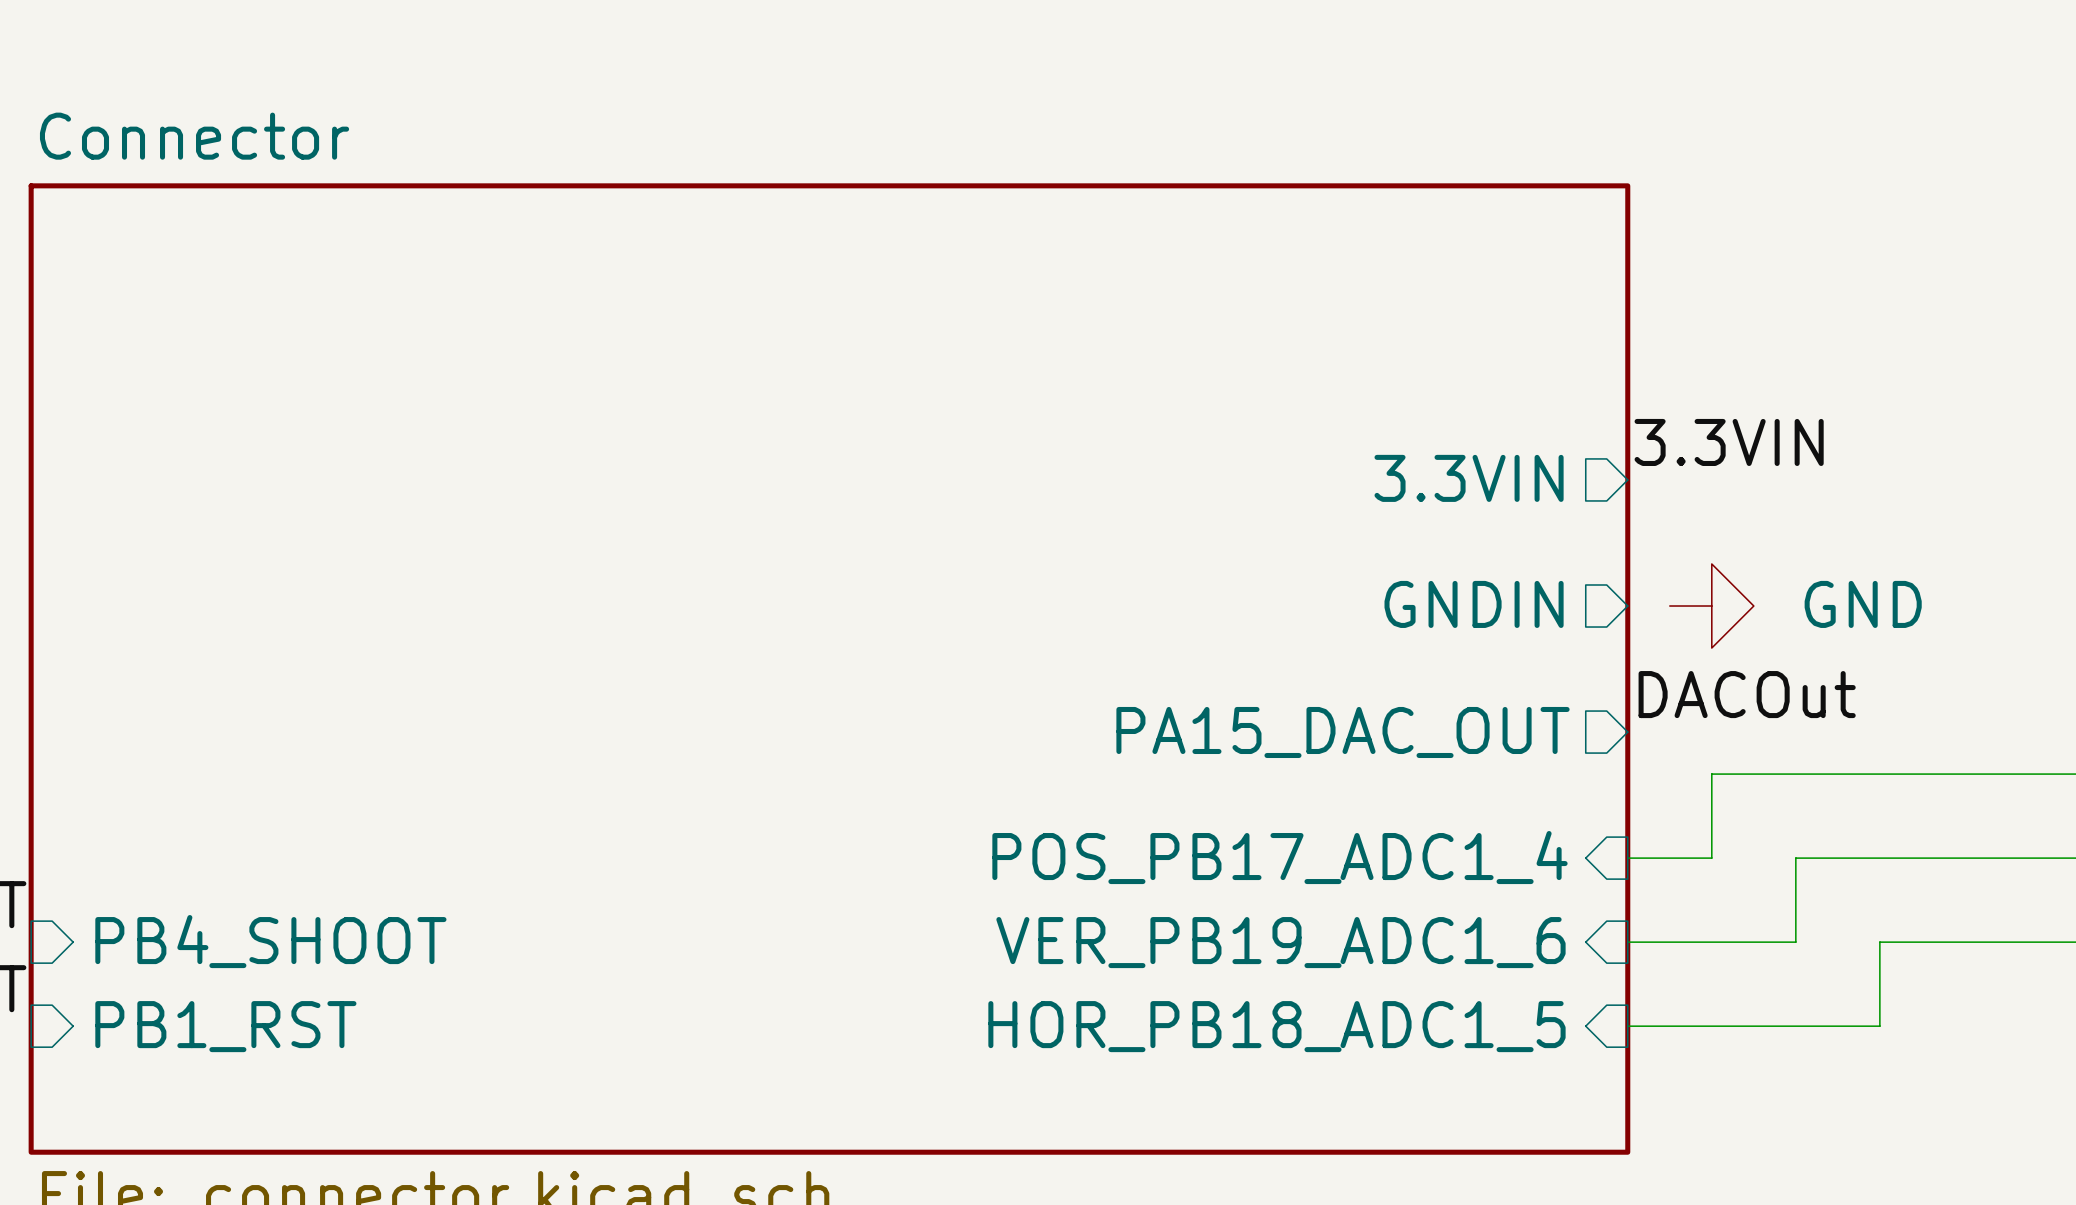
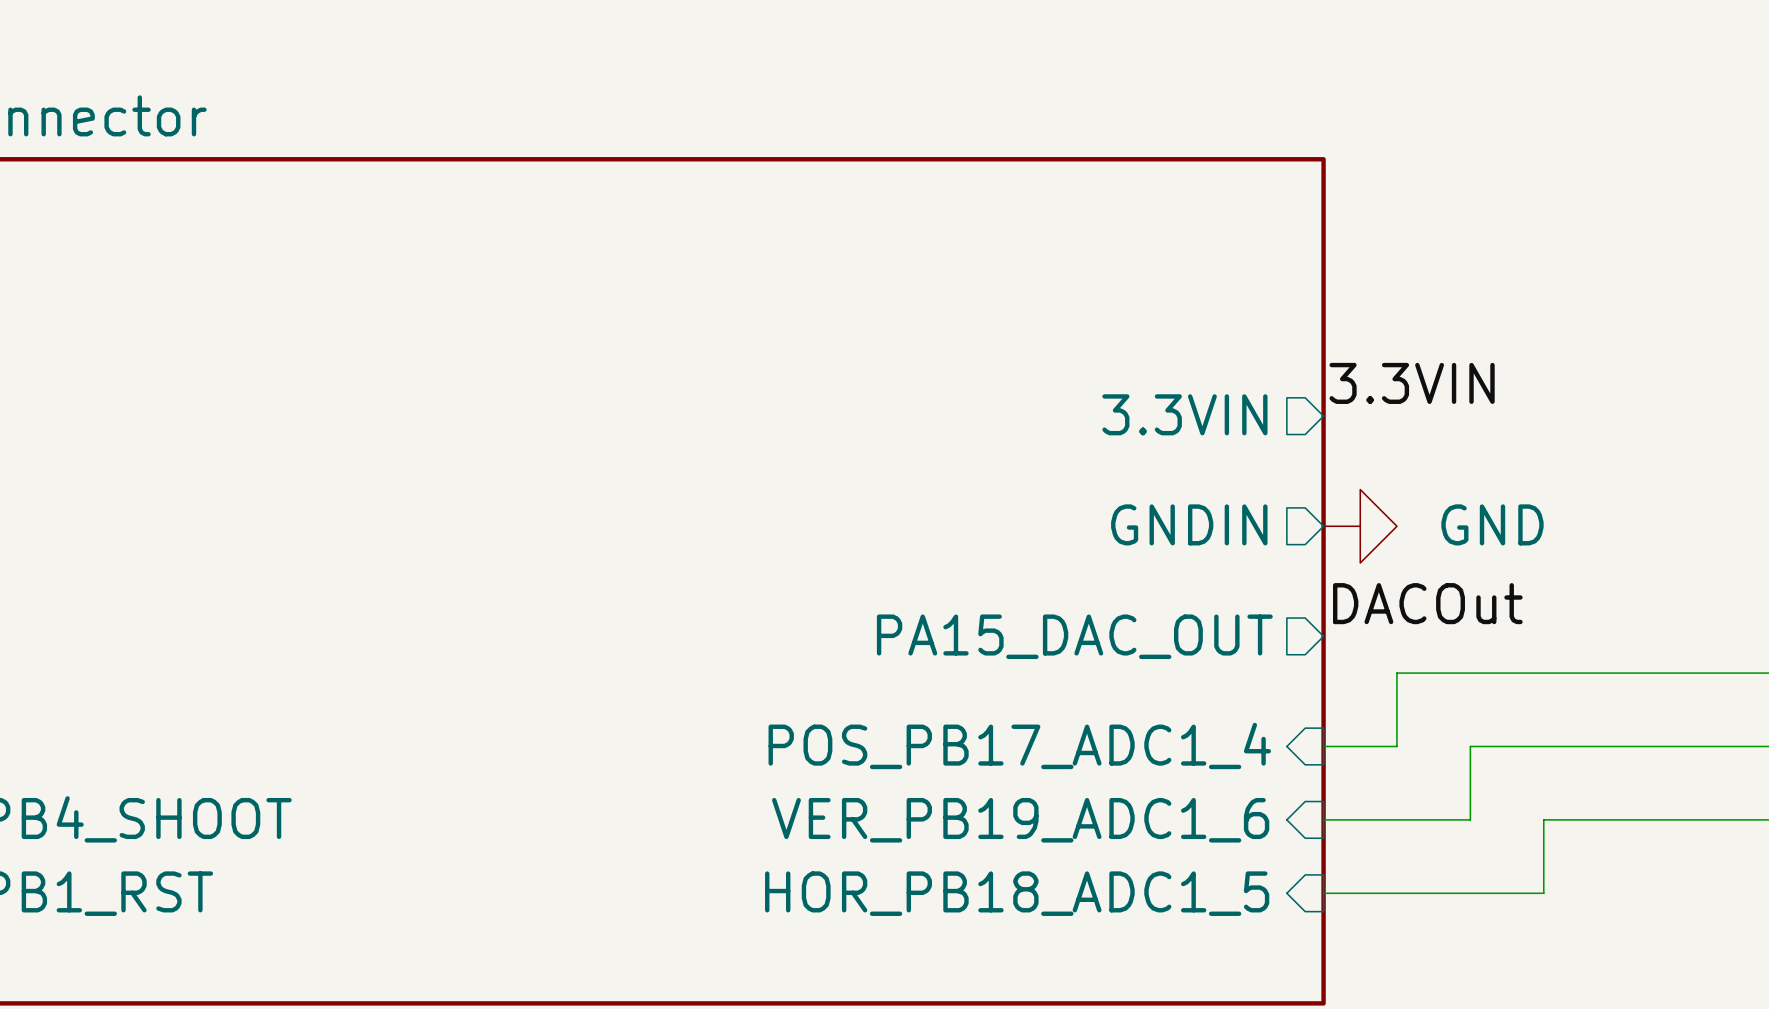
power symbol position: GND (1711, 606) -> GND (1360, 526)

